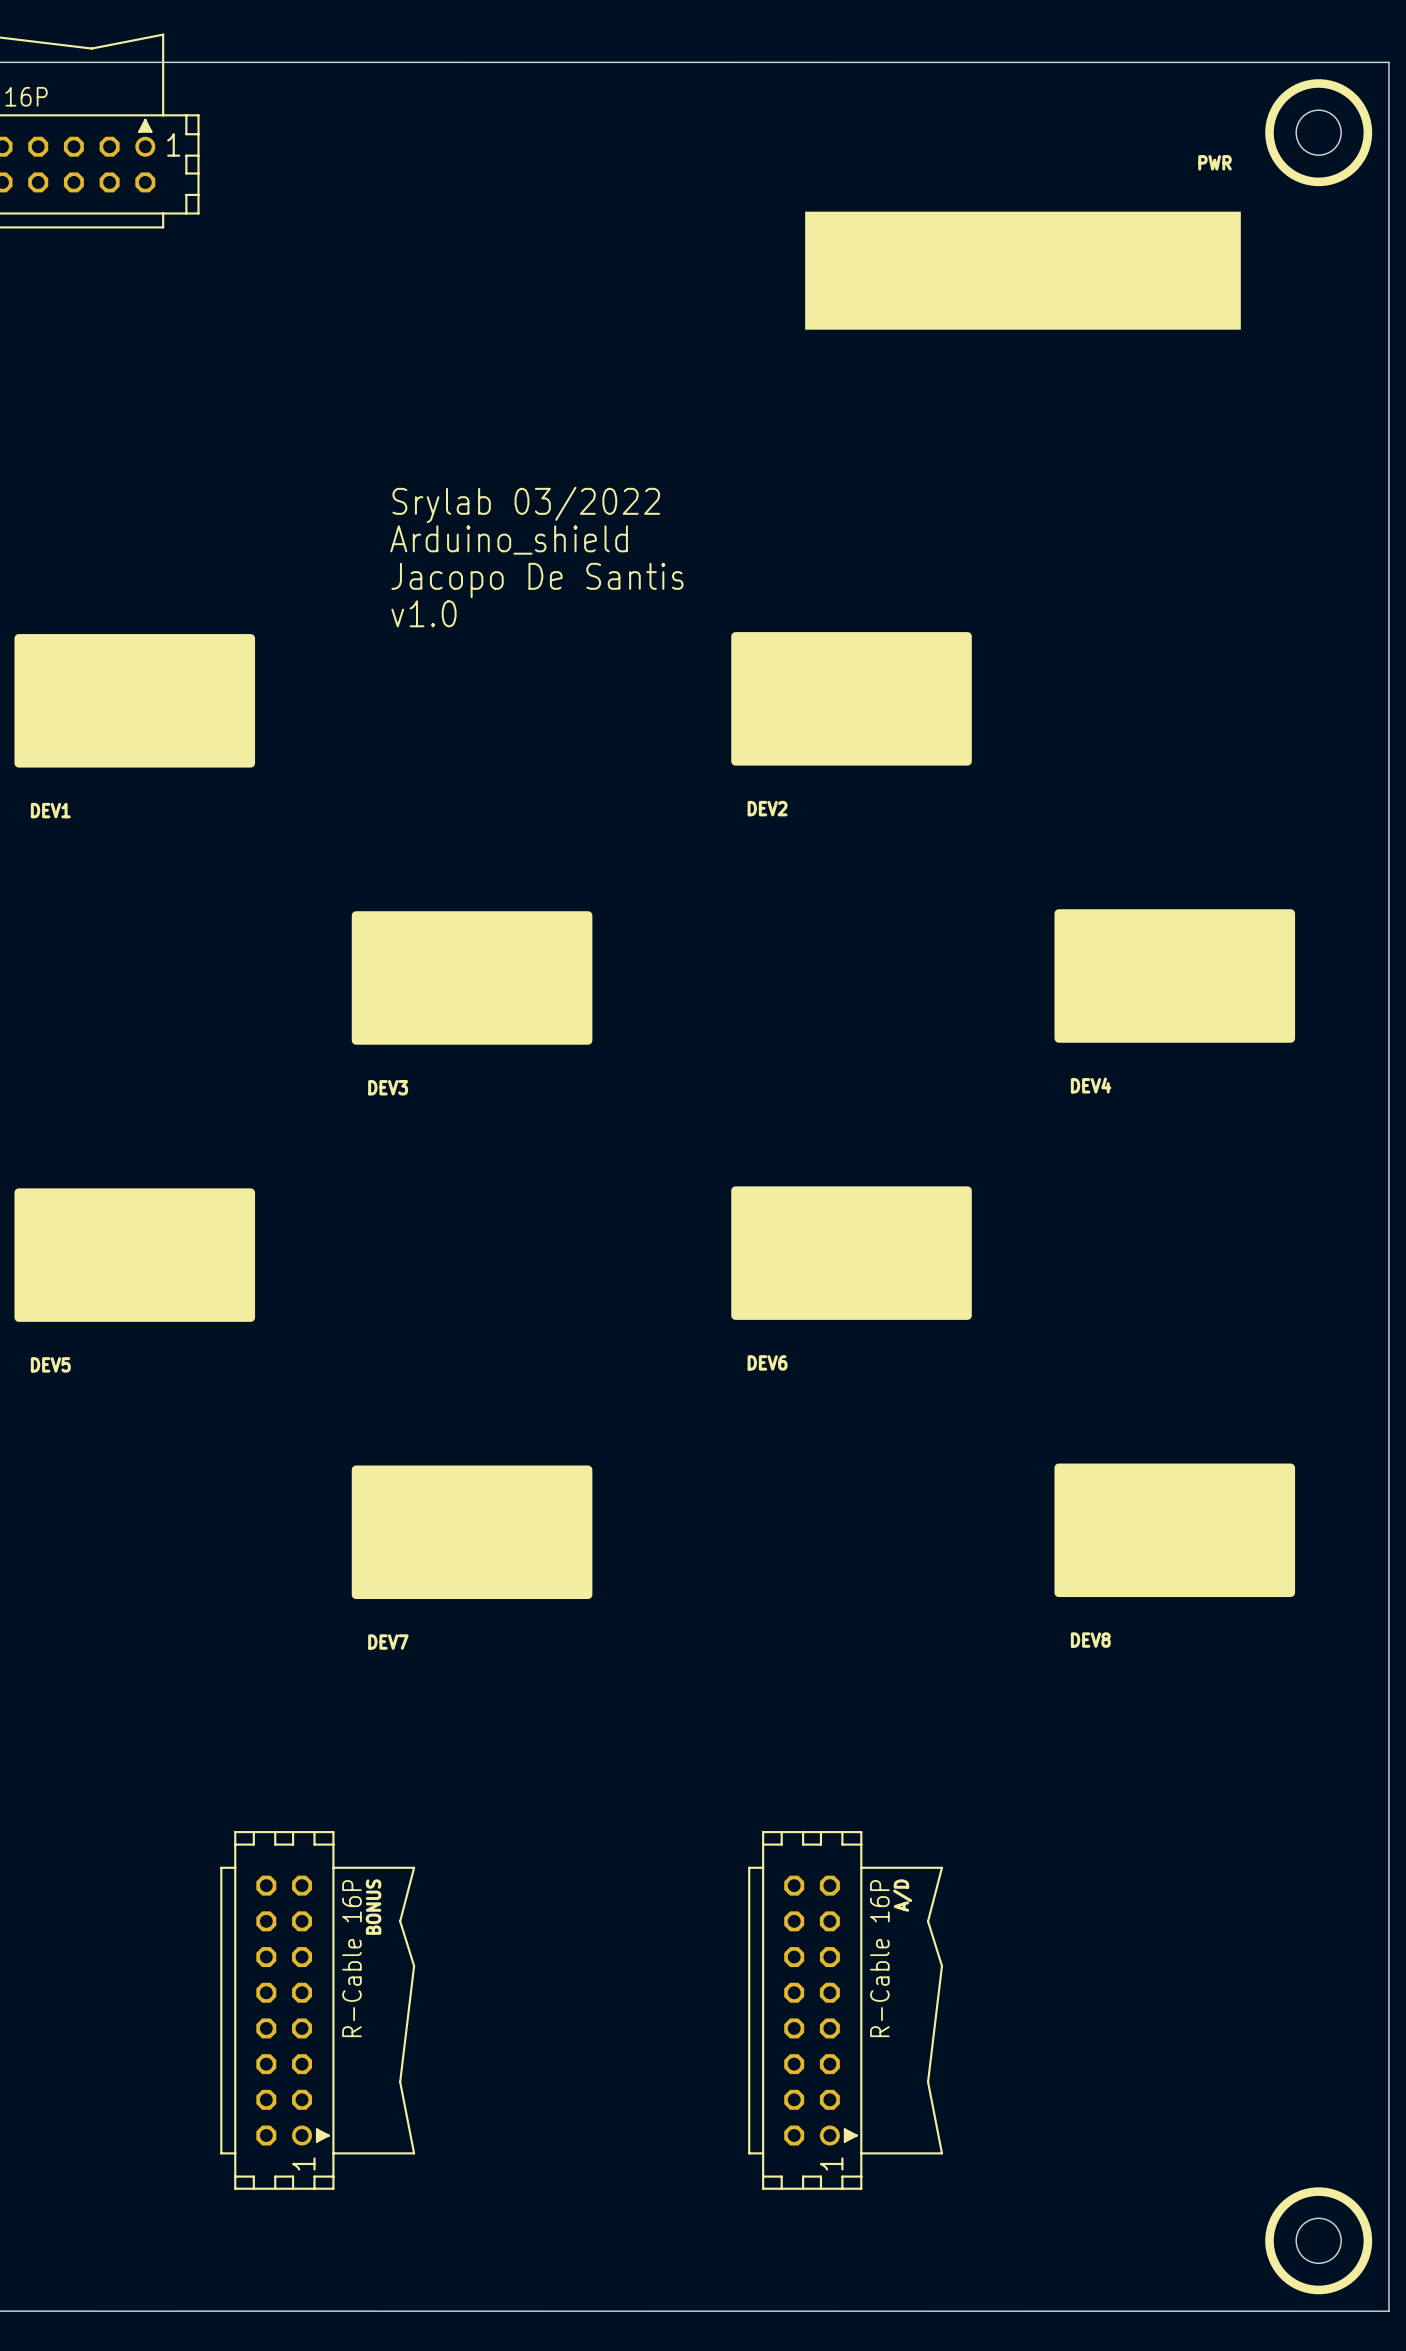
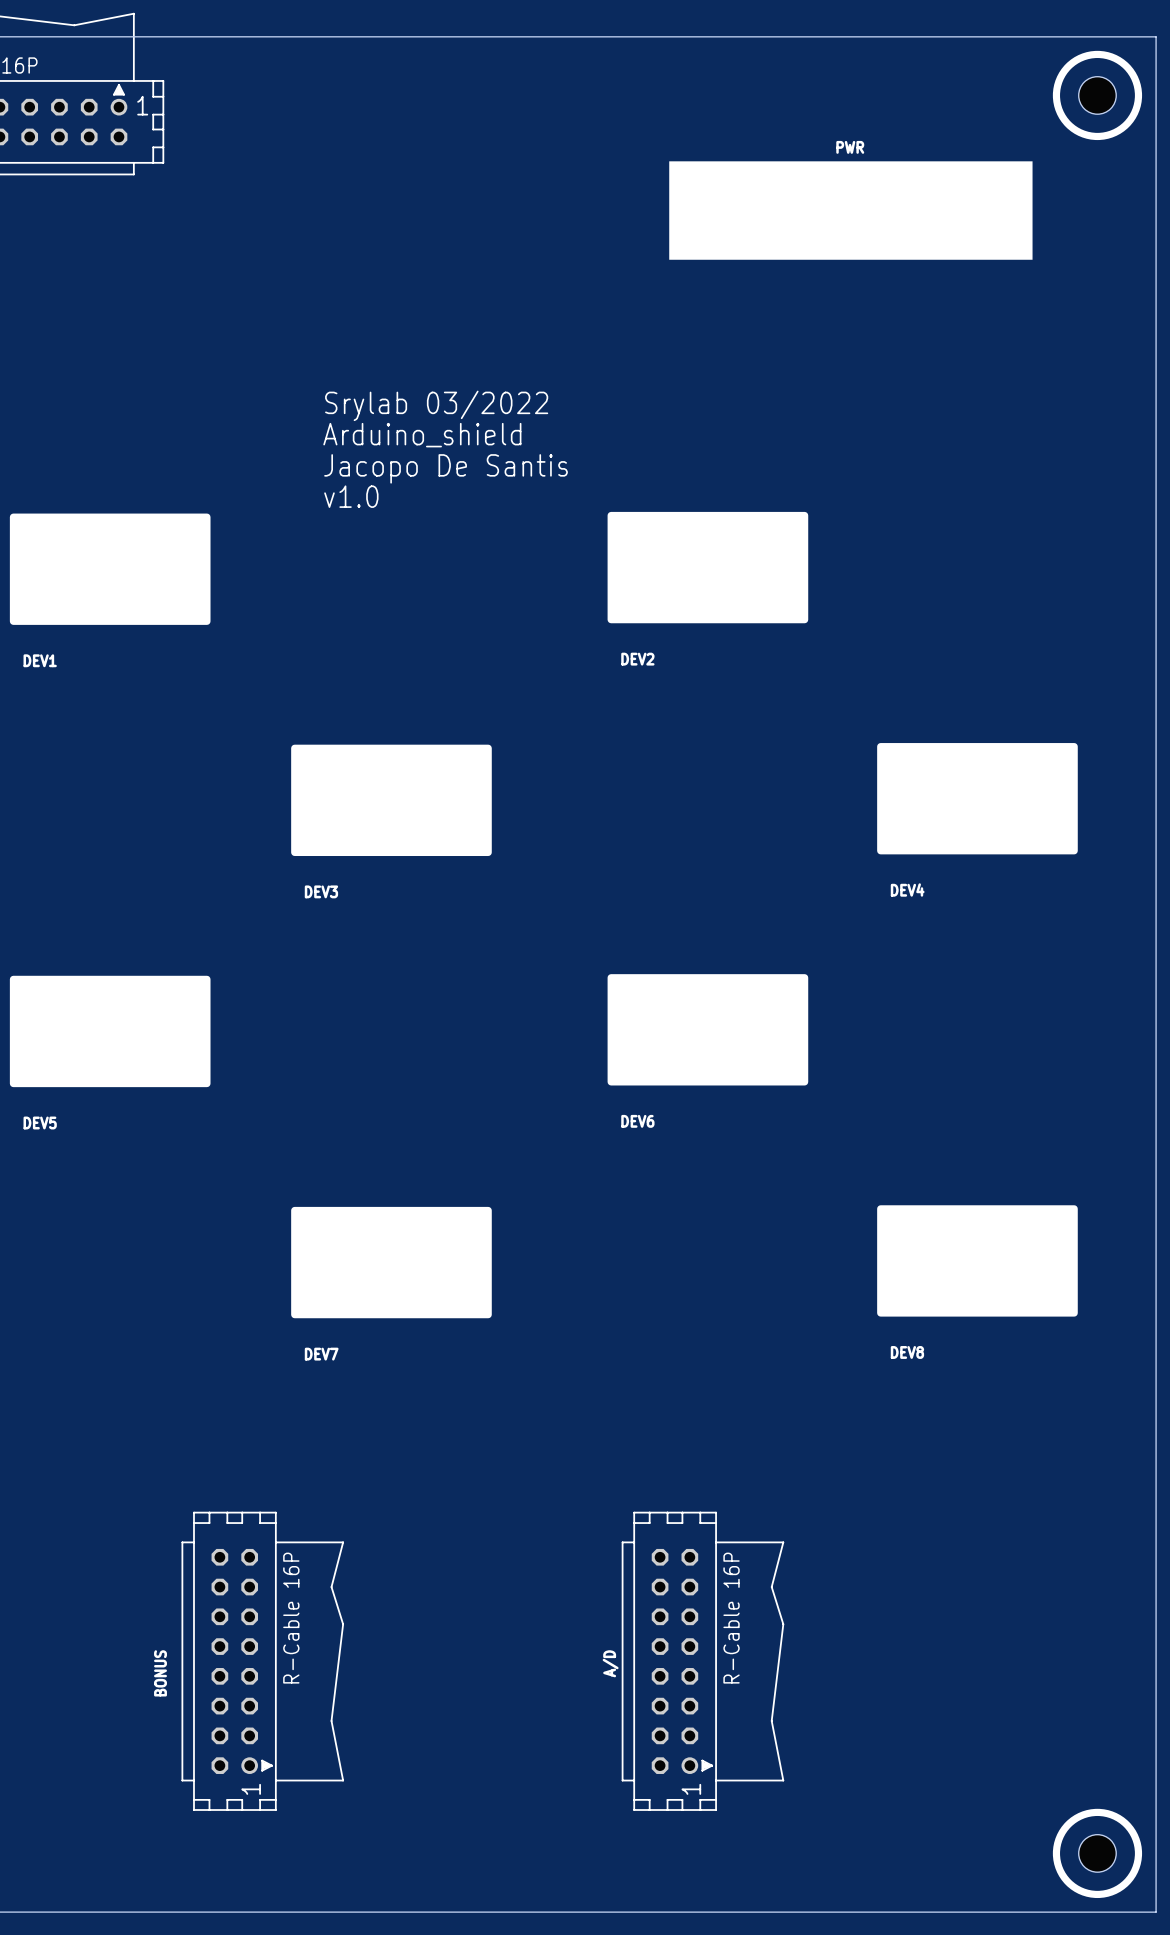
PWR name position: PWR (1214, 162) -> PWR (850, 147)
A/D name position: A/D (902, 1895) -> A/D (610, 1663)
BONUS name position: BONUS (373, 1907) -> BONUS (160, 1673)

